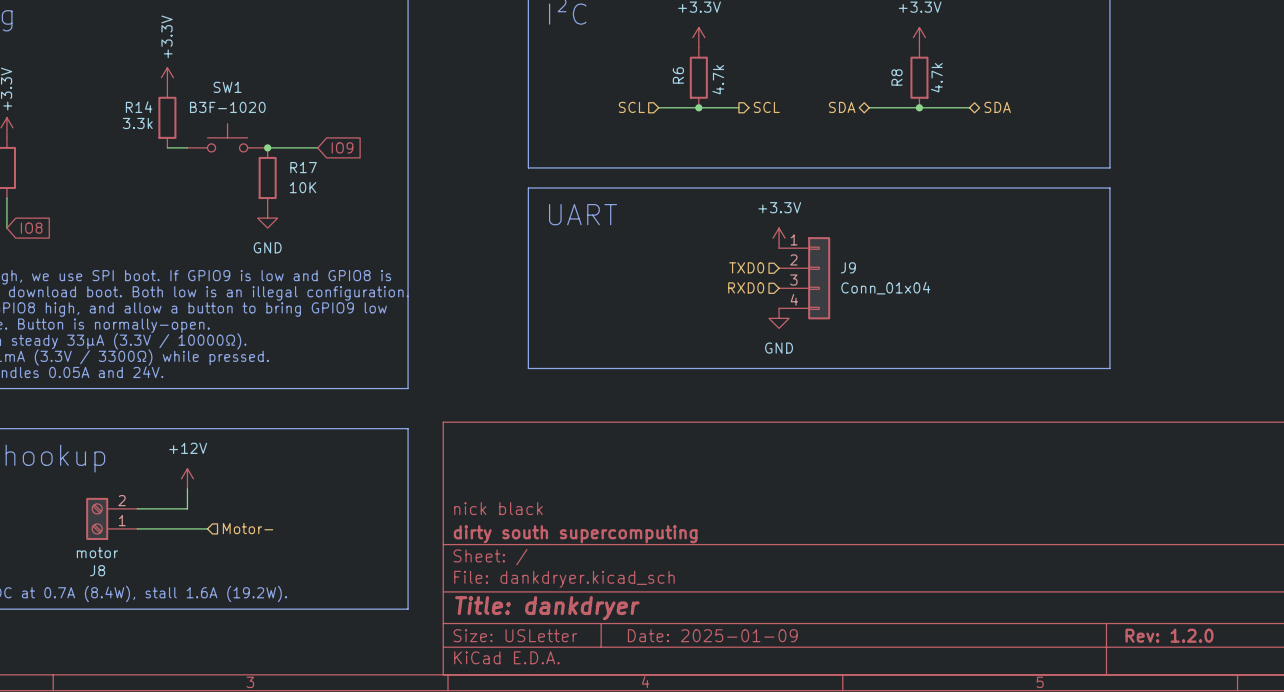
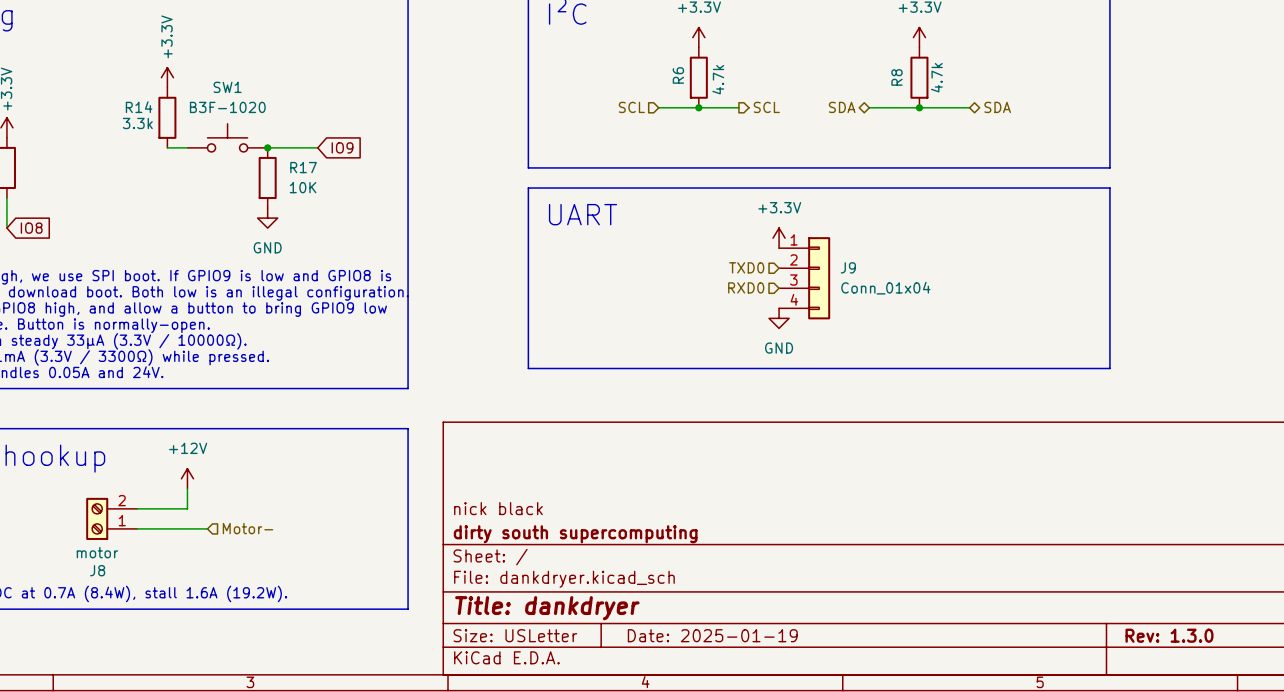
title block: Date: 2025-01-09 (712, 635) -> Date: 2025-01-19 (712, 635)
title block: Rev: 1.2.0 (1169, 635) -> Rev: 1.3.0 (1169, 635)

